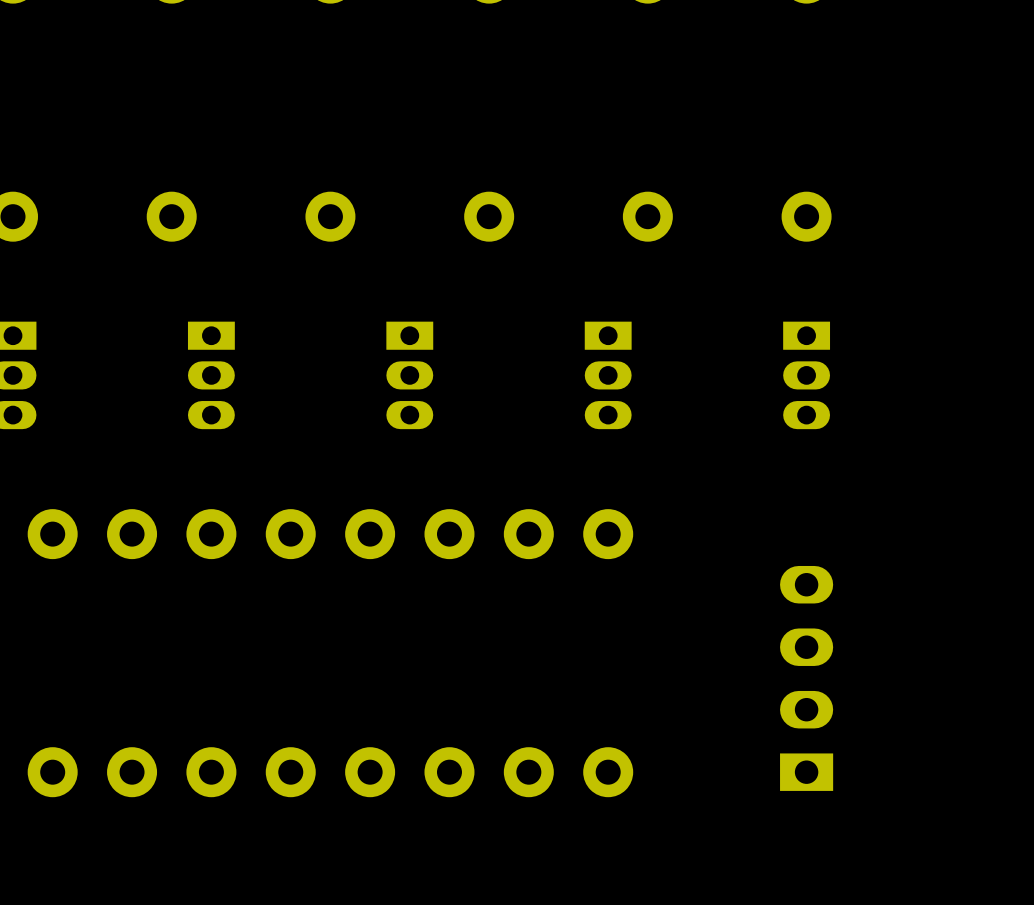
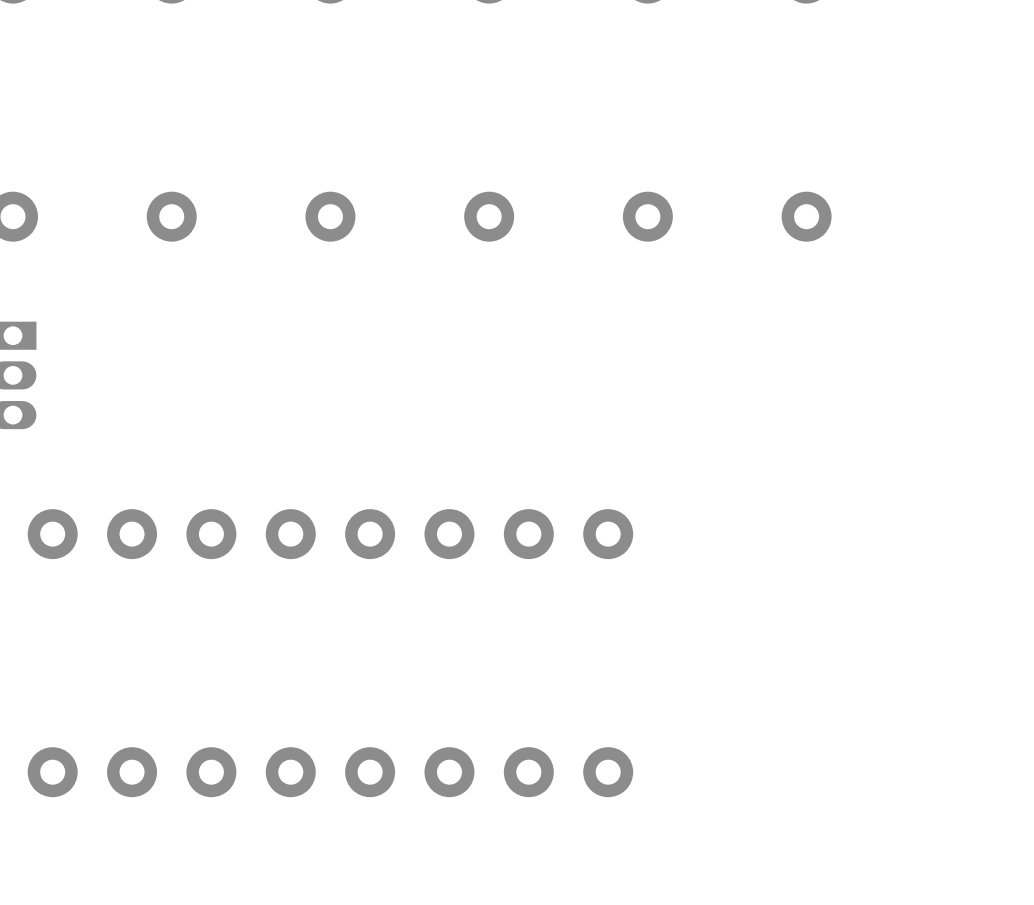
part: (211, 375) -> none
part: (409, 375) -> none
part: (608, 375) -> none
part: (806, 375) -> none
part: (806, 678) -> none

